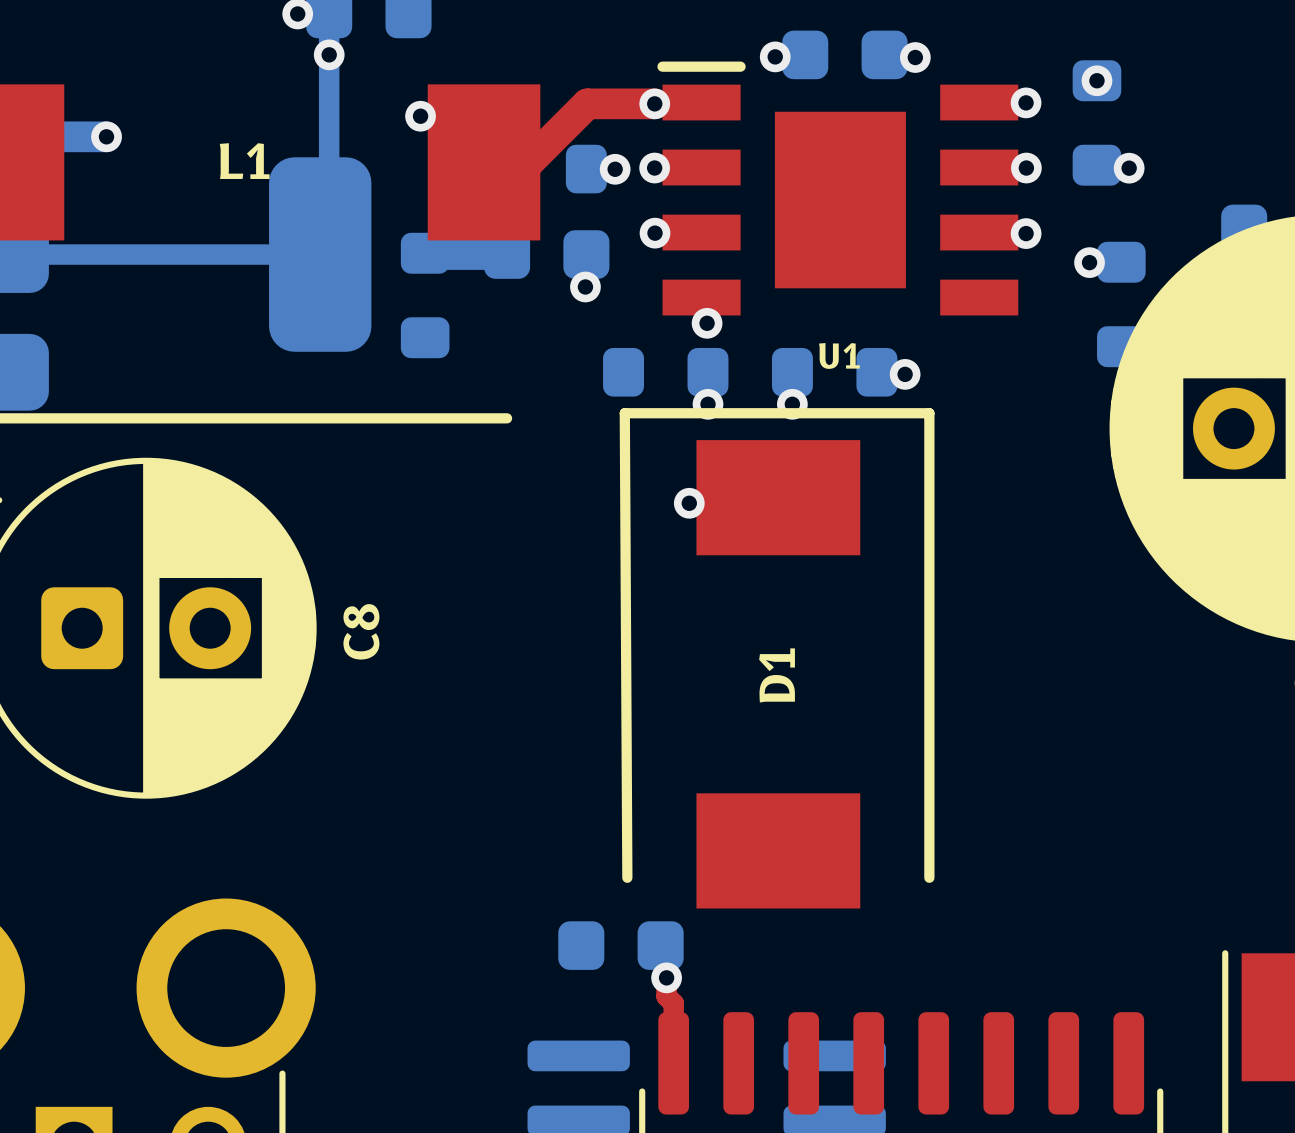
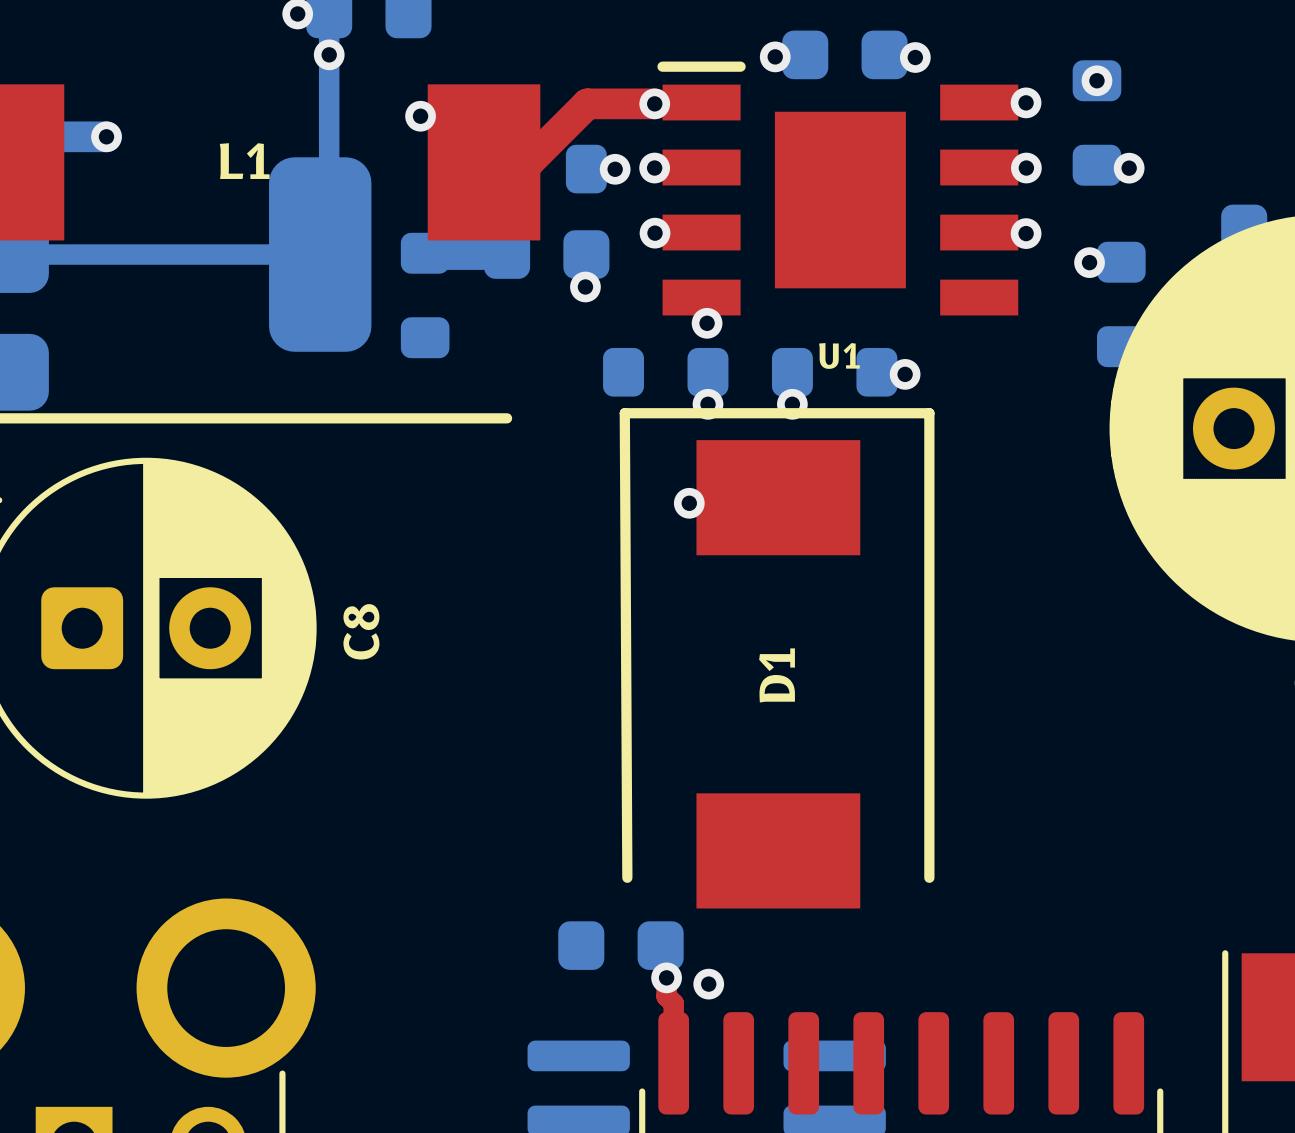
via: none -> (708, 984)

